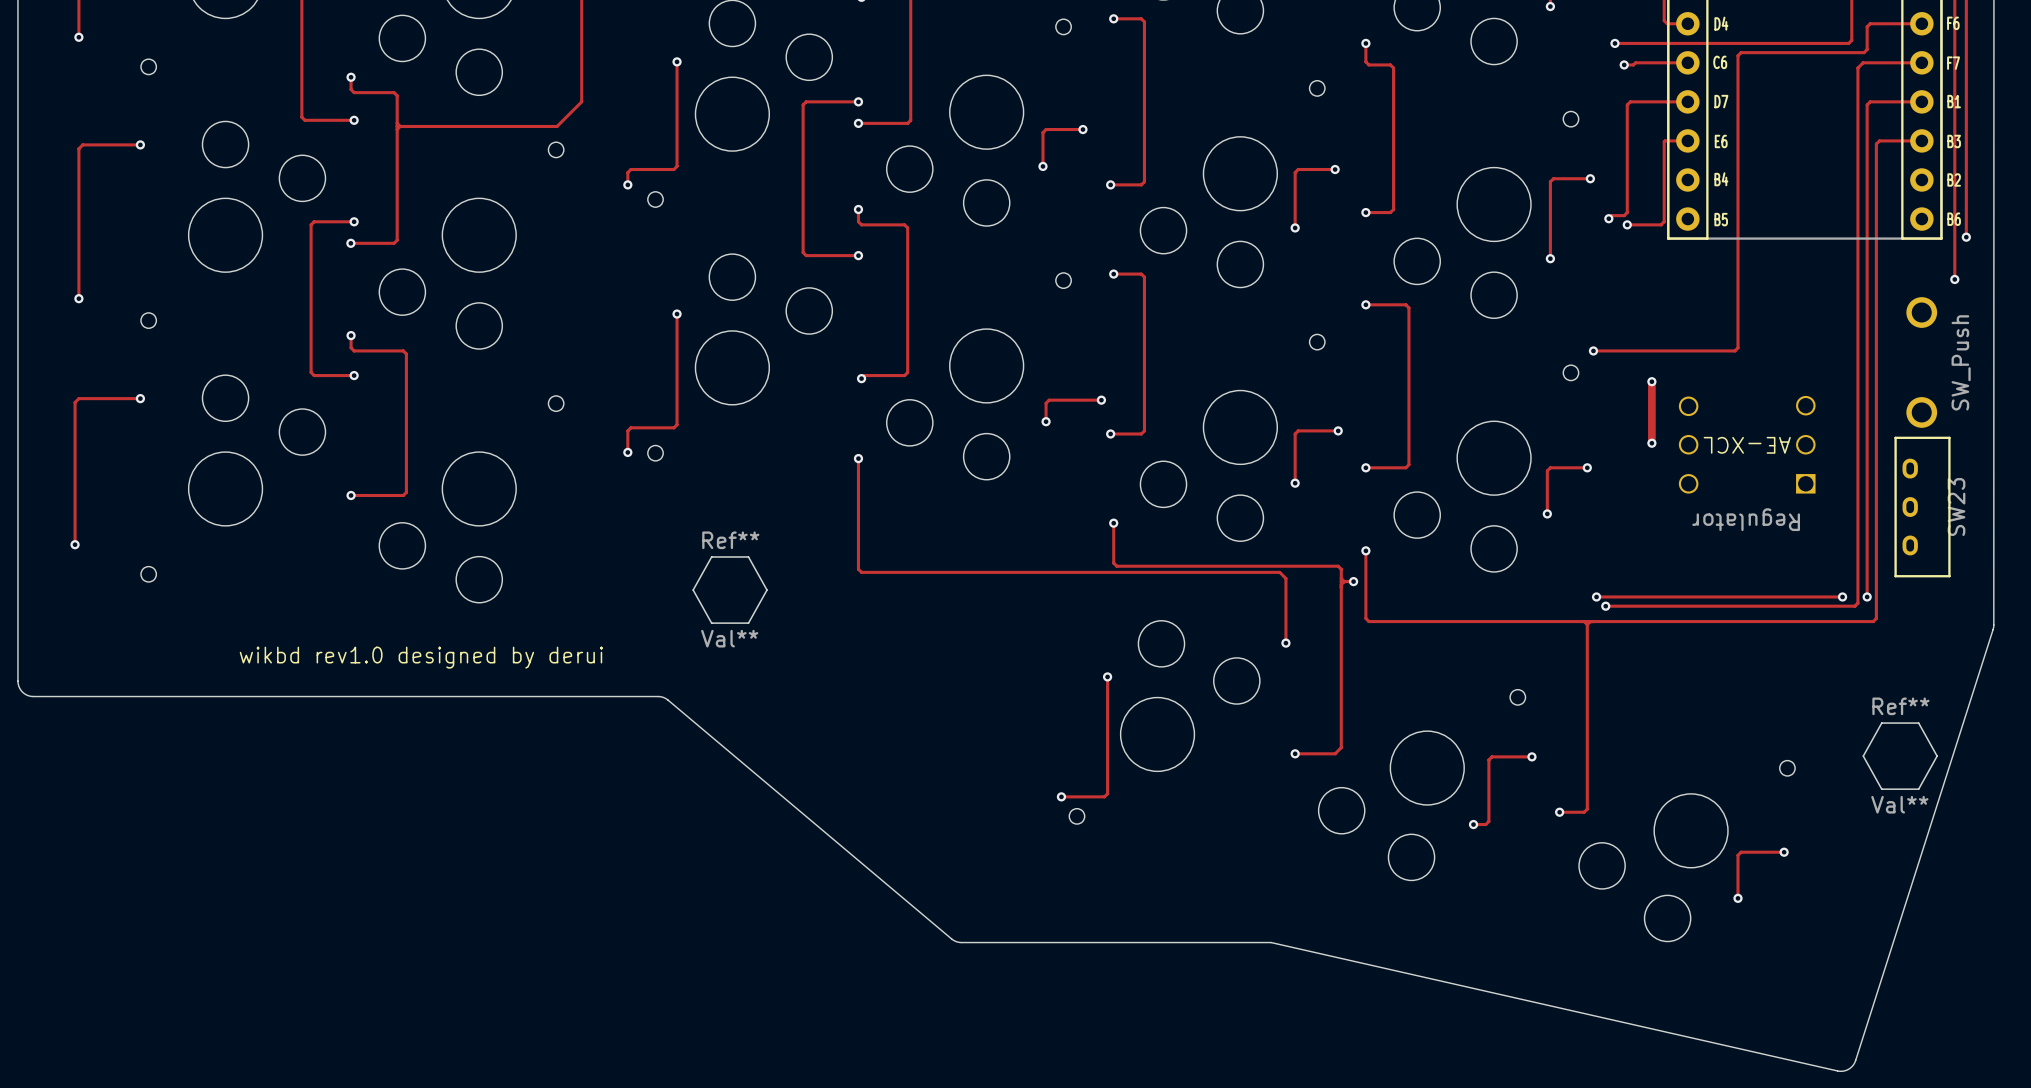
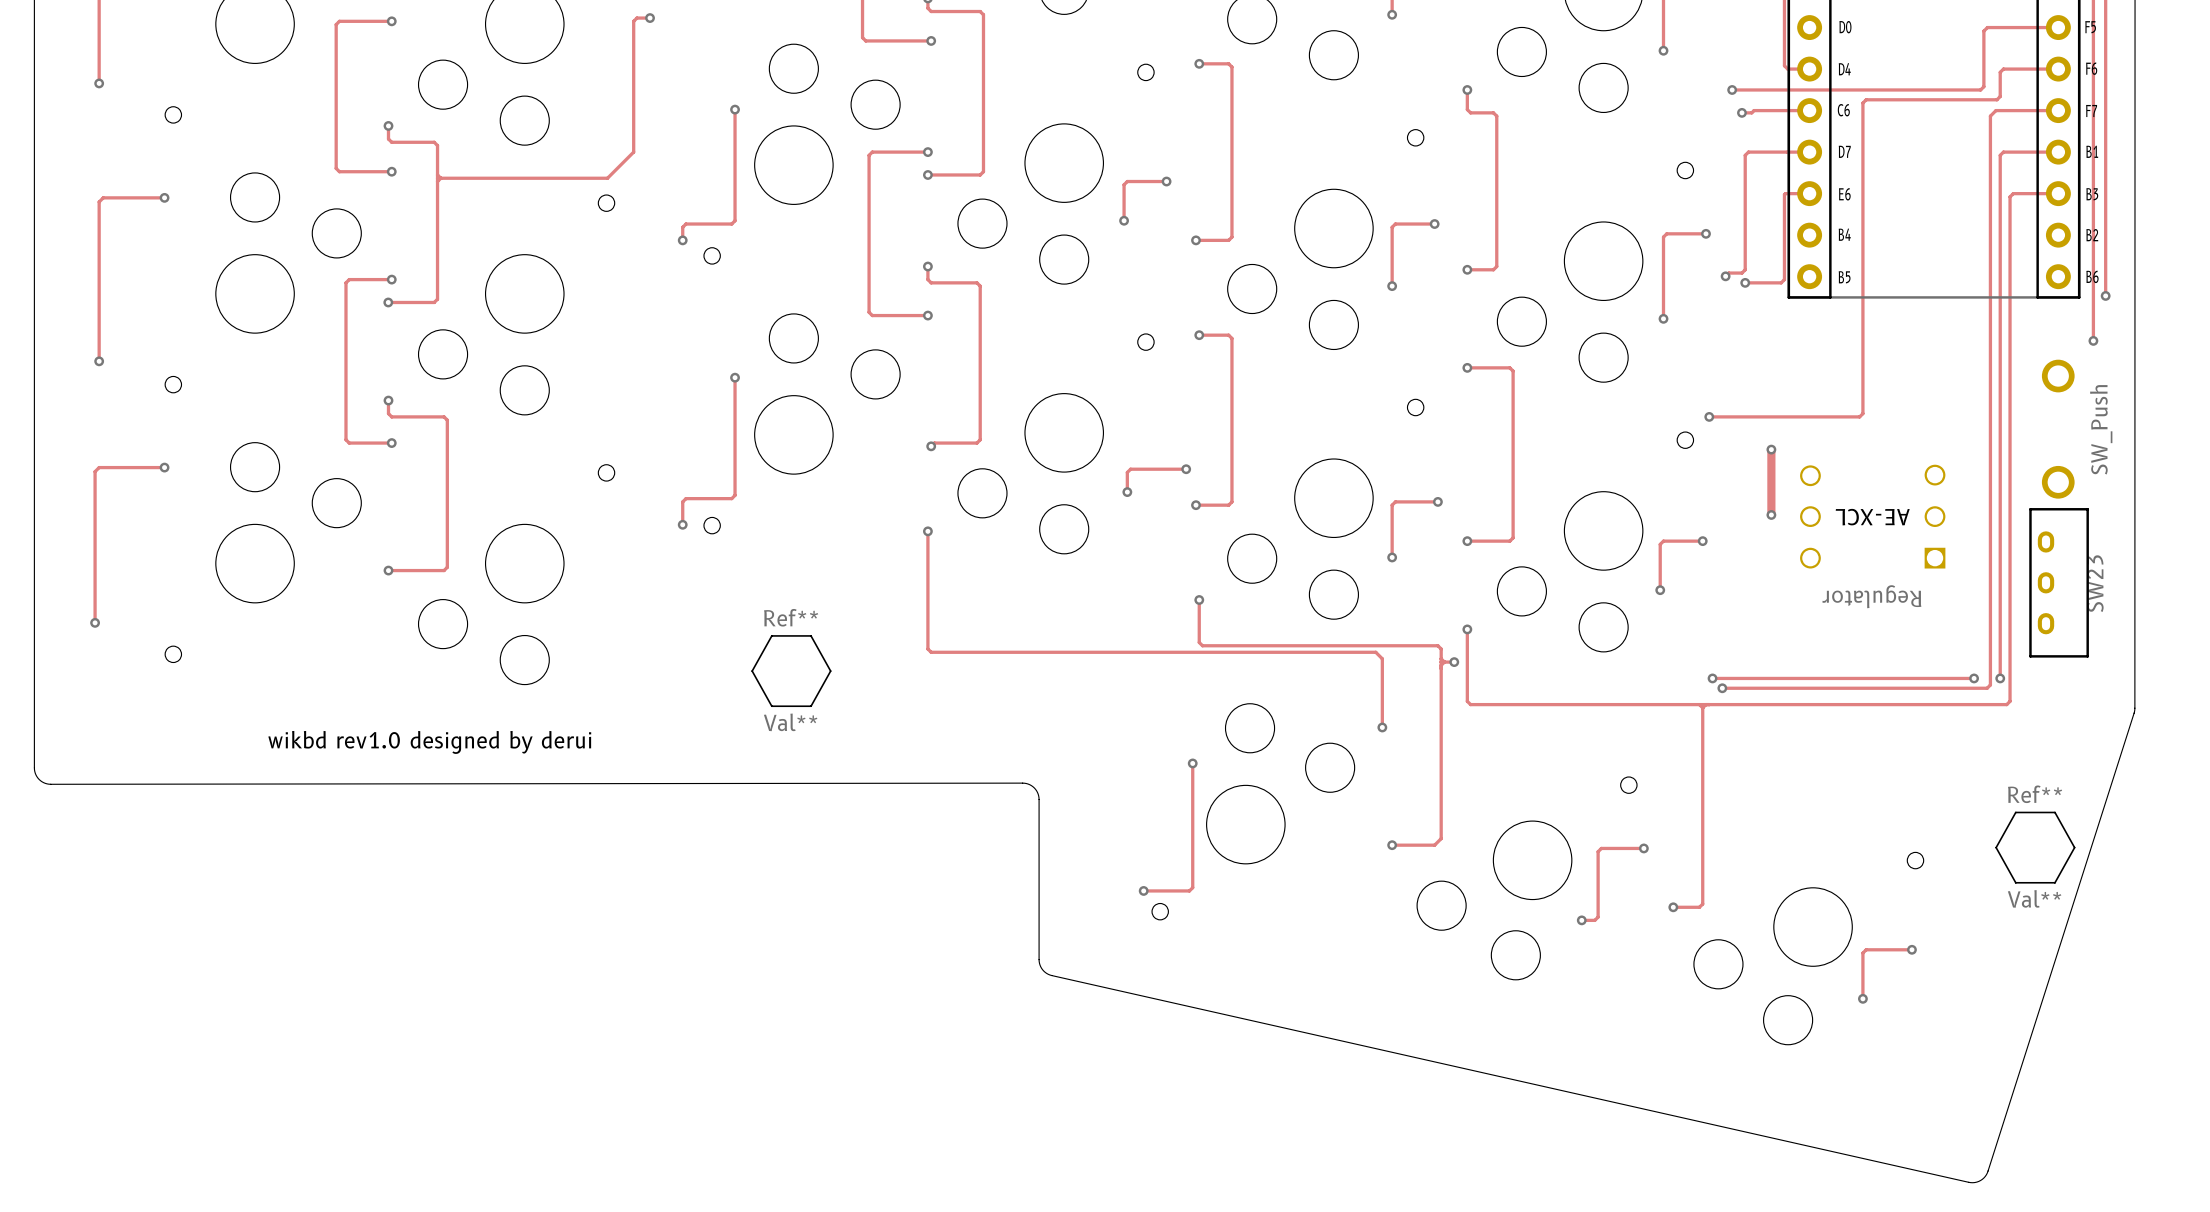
board edge: (33, 696) (661, 696) (668, 700) (956, 941) (1271, 942) (1837, 1070) -> (50, 784) (1026, 783) (1035, 789) (1038, 797) (1039, 959) (1041, 968) (1048, 974) (1968, 1182)

